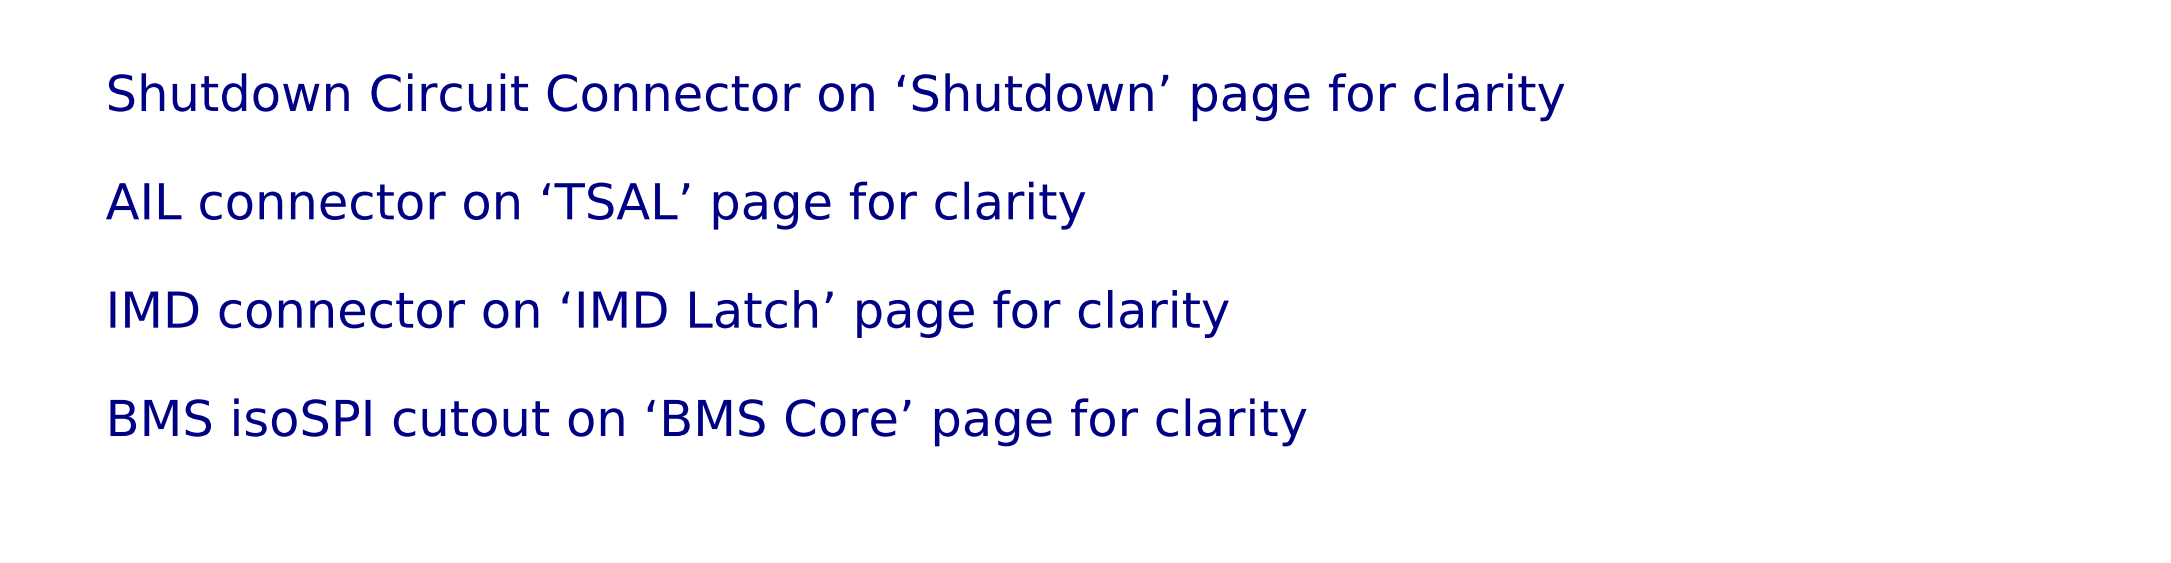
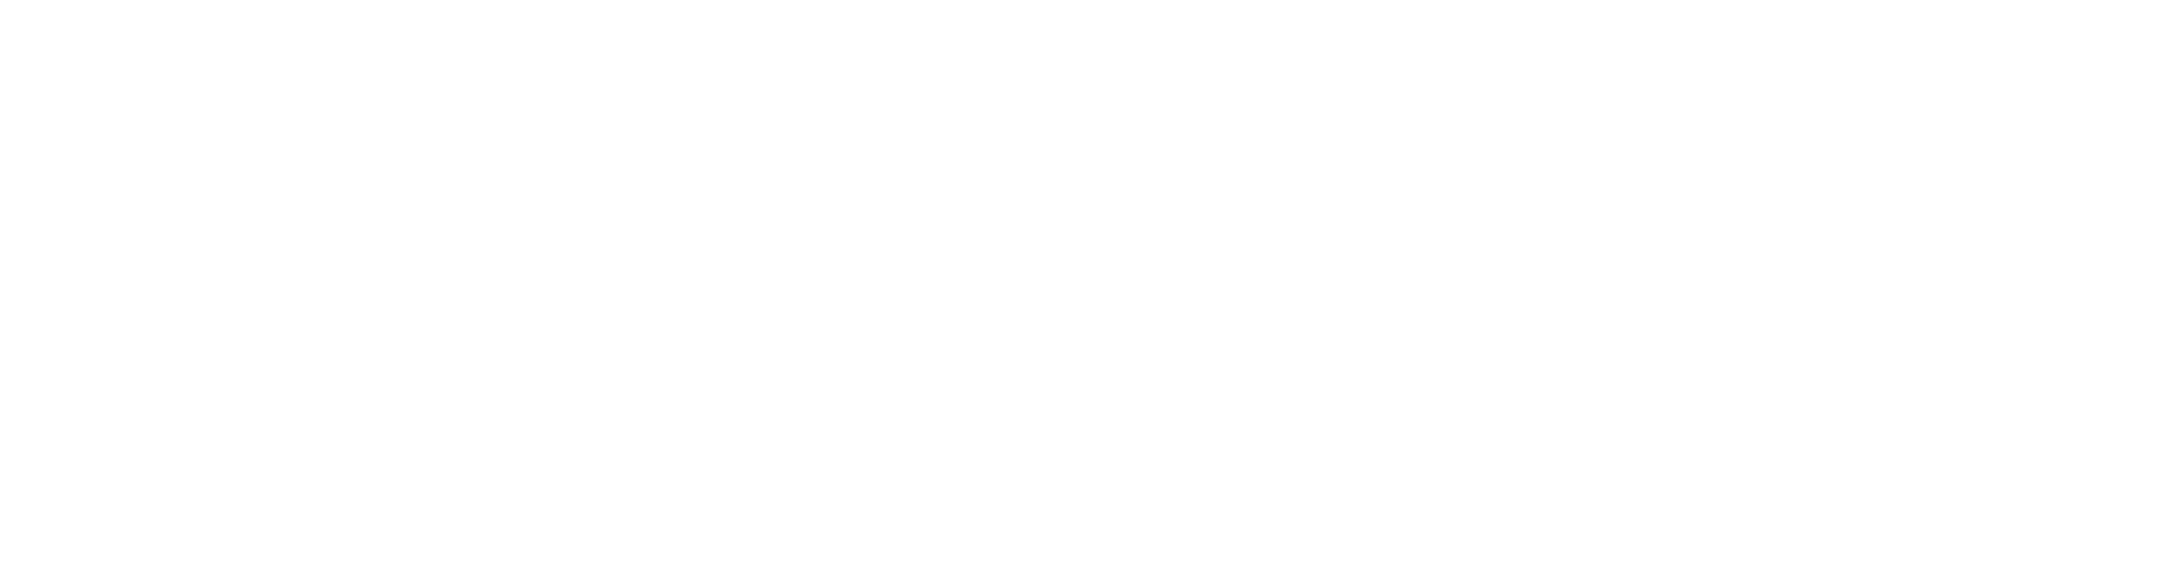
text: Shutdown Circuit Connector on ‘Shutdown’ page for clarity (836, 97) -> none
text: AIL connector on ‘TSAL’ page for clarity (595, 205) -> none
text: IMD connector on ‘IMD Latch’ page for clarity (669, 313) -> none
text: BMS isoSPI cutout on ‘BMS Core’ page for clarity (708, 422) -> none

